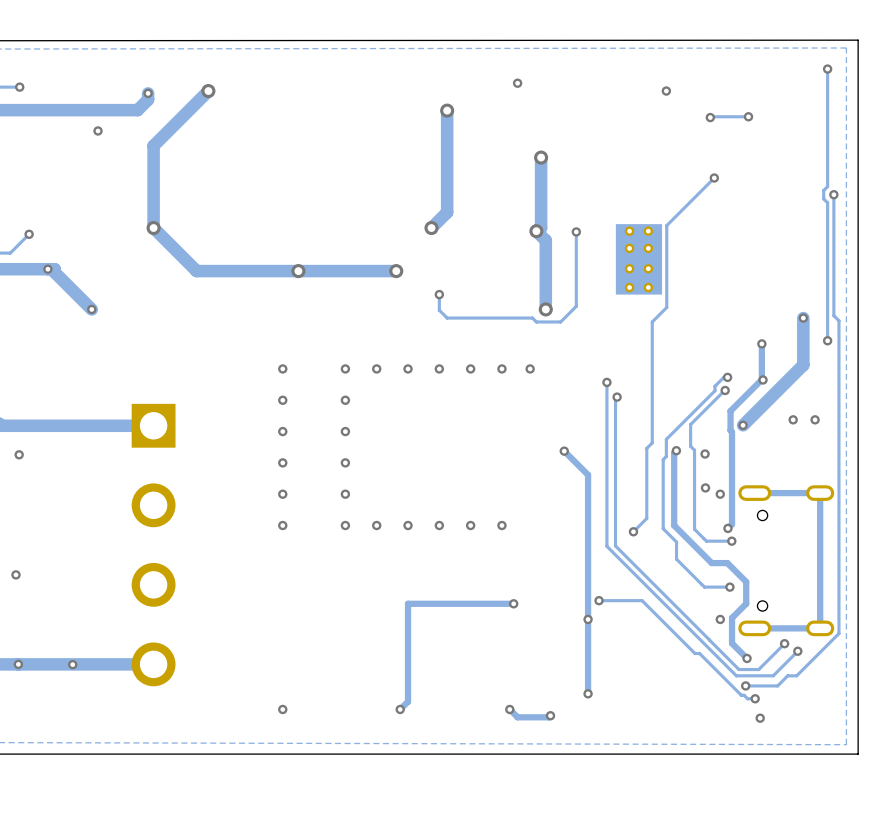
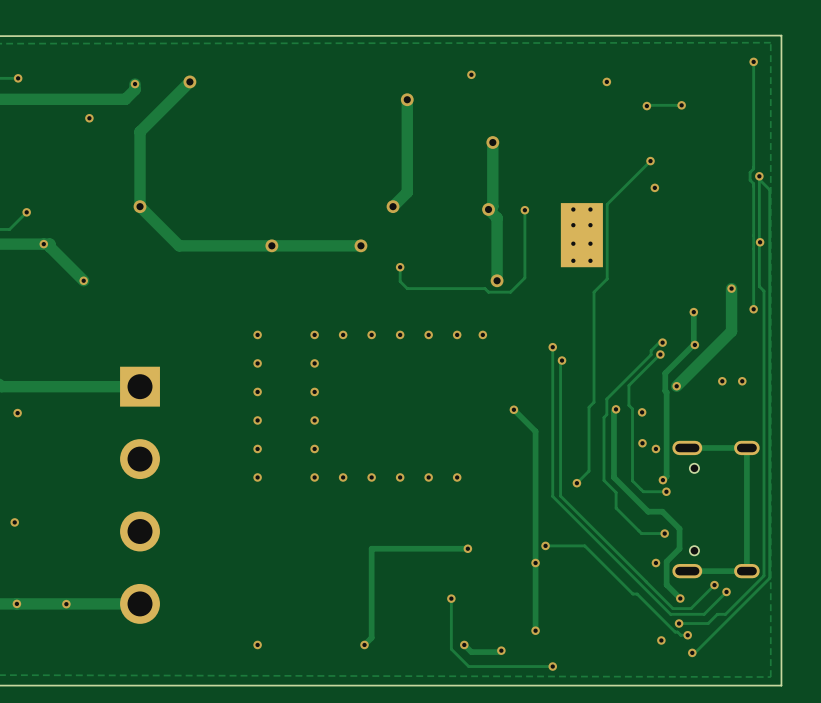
track: none -> (756, 177) (769, 189) (769, 578) (695, 652) (692, 652)
via: none -> (654, 187)
via: none -> (760, 242)
track: none -> (451, 598) (451, 649) (468, 666) (552, 666)
via: none -> (451, 598)
via: none -> (661, 640)
via: none -> (552, 666)

